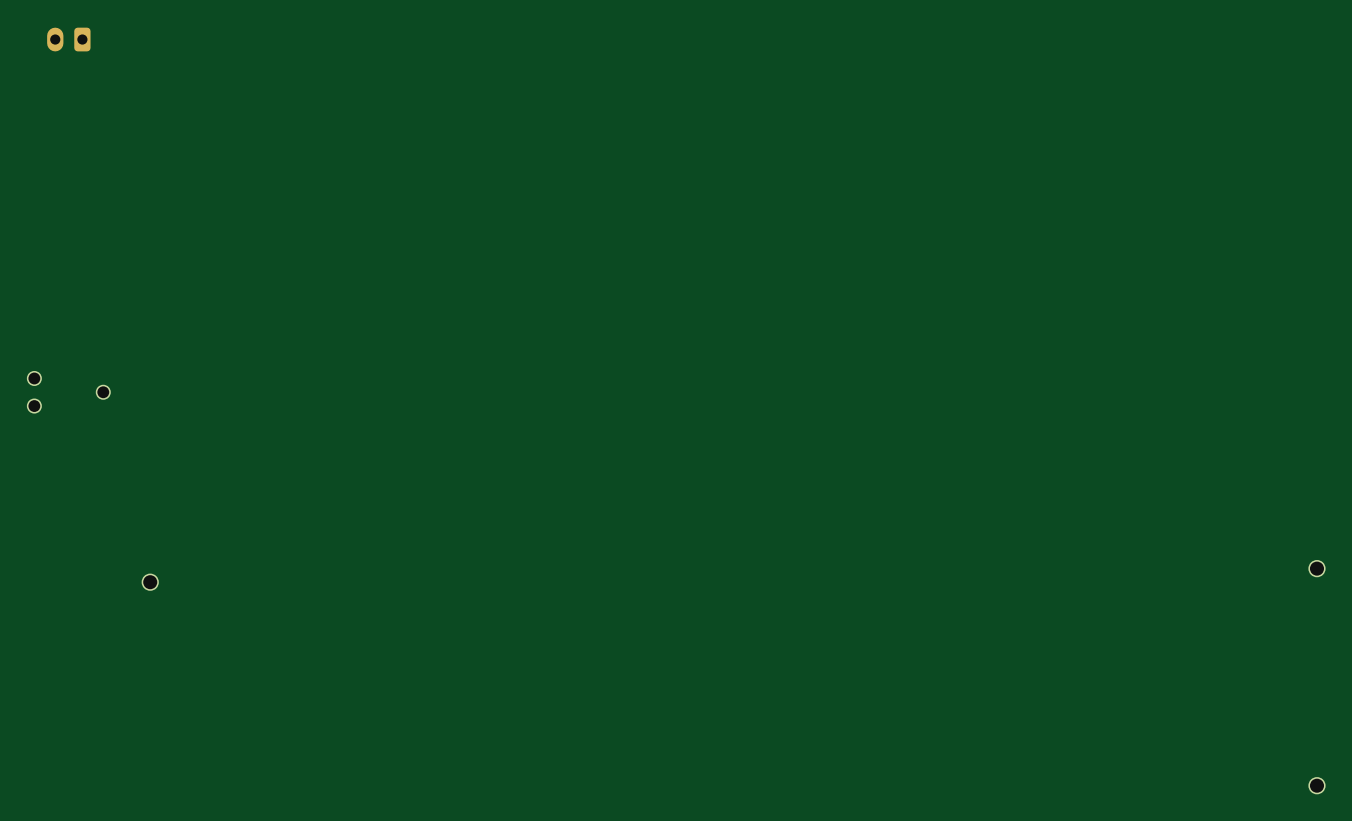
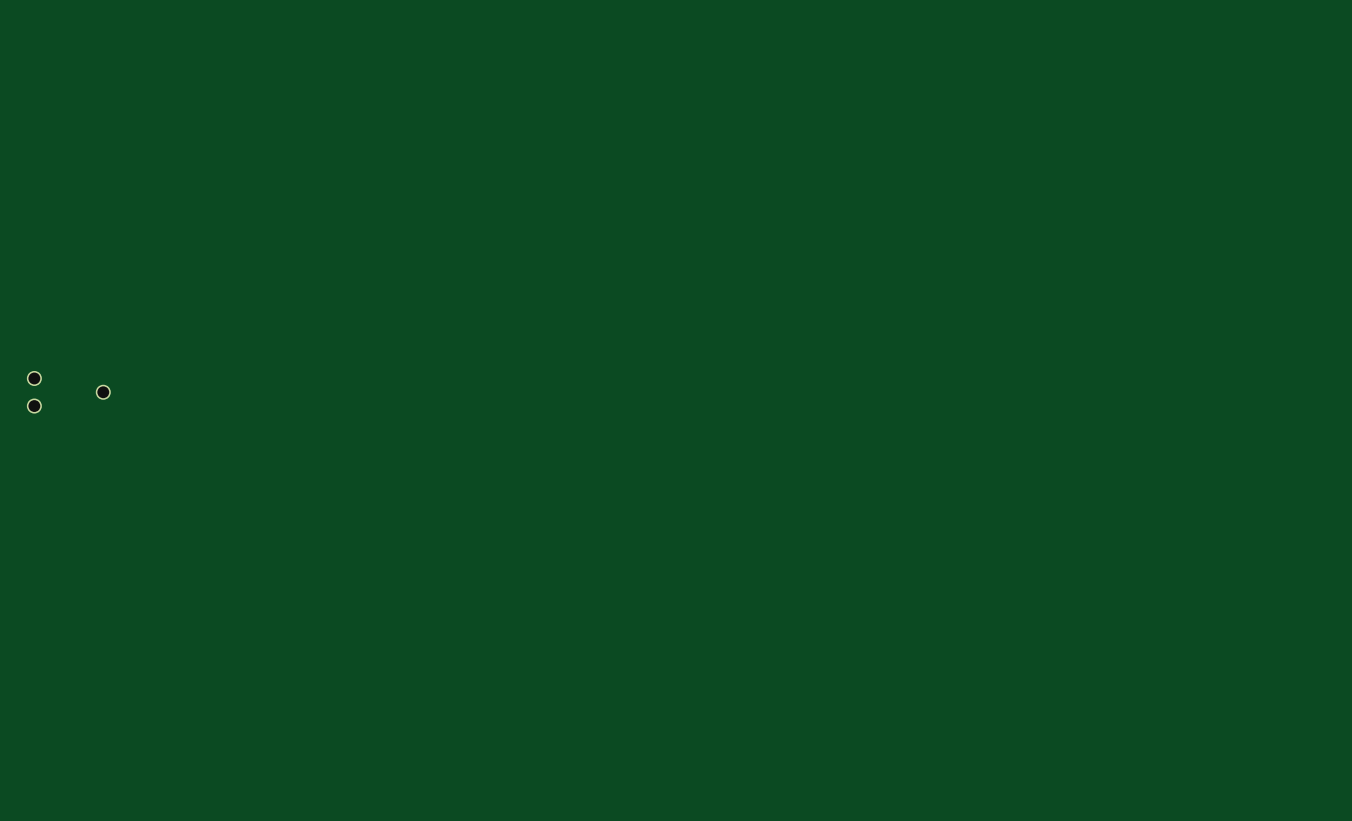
part: (68, 39) -> none
part: (1316, 568) -> none
part: (150, 582) -> none
part: (1316, 785) -> none

